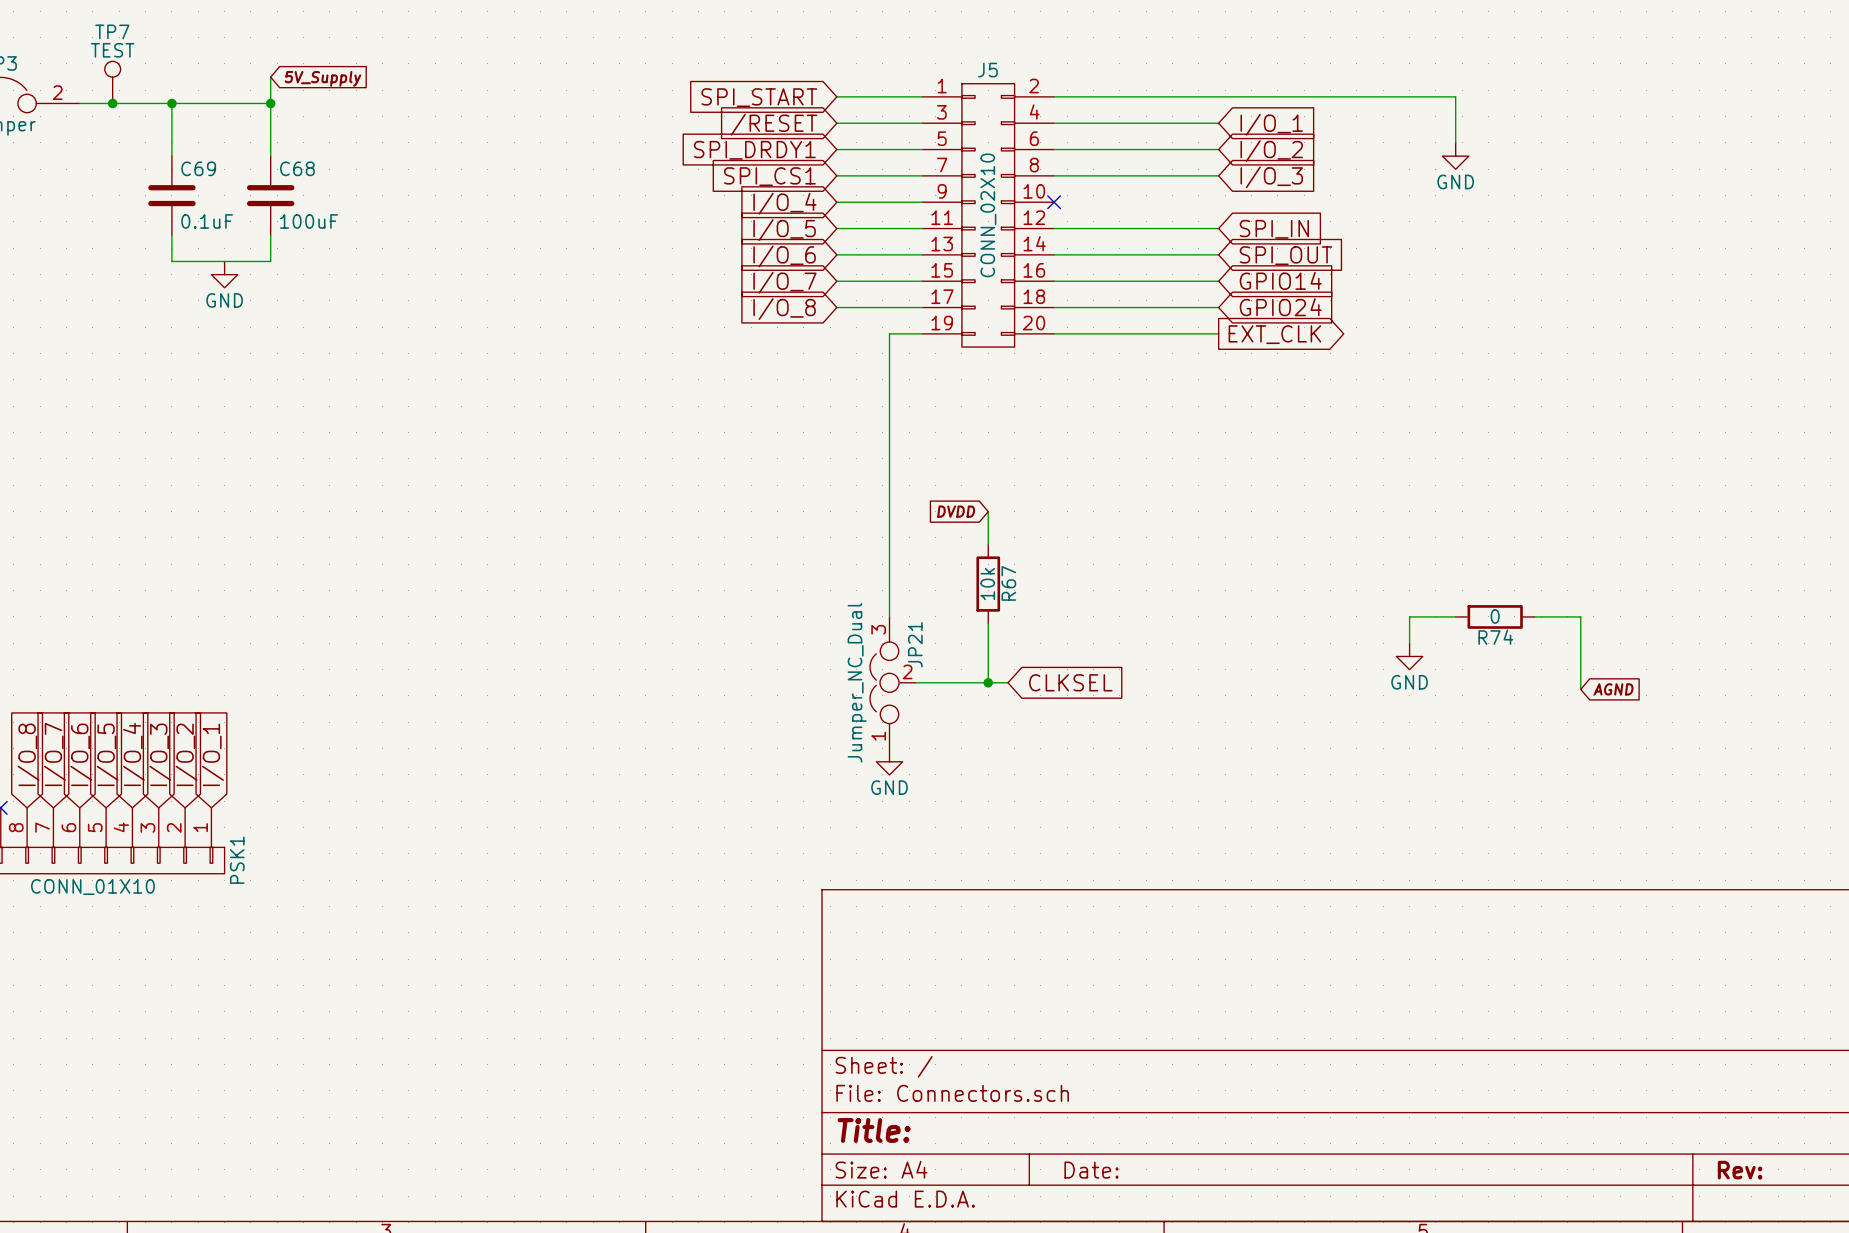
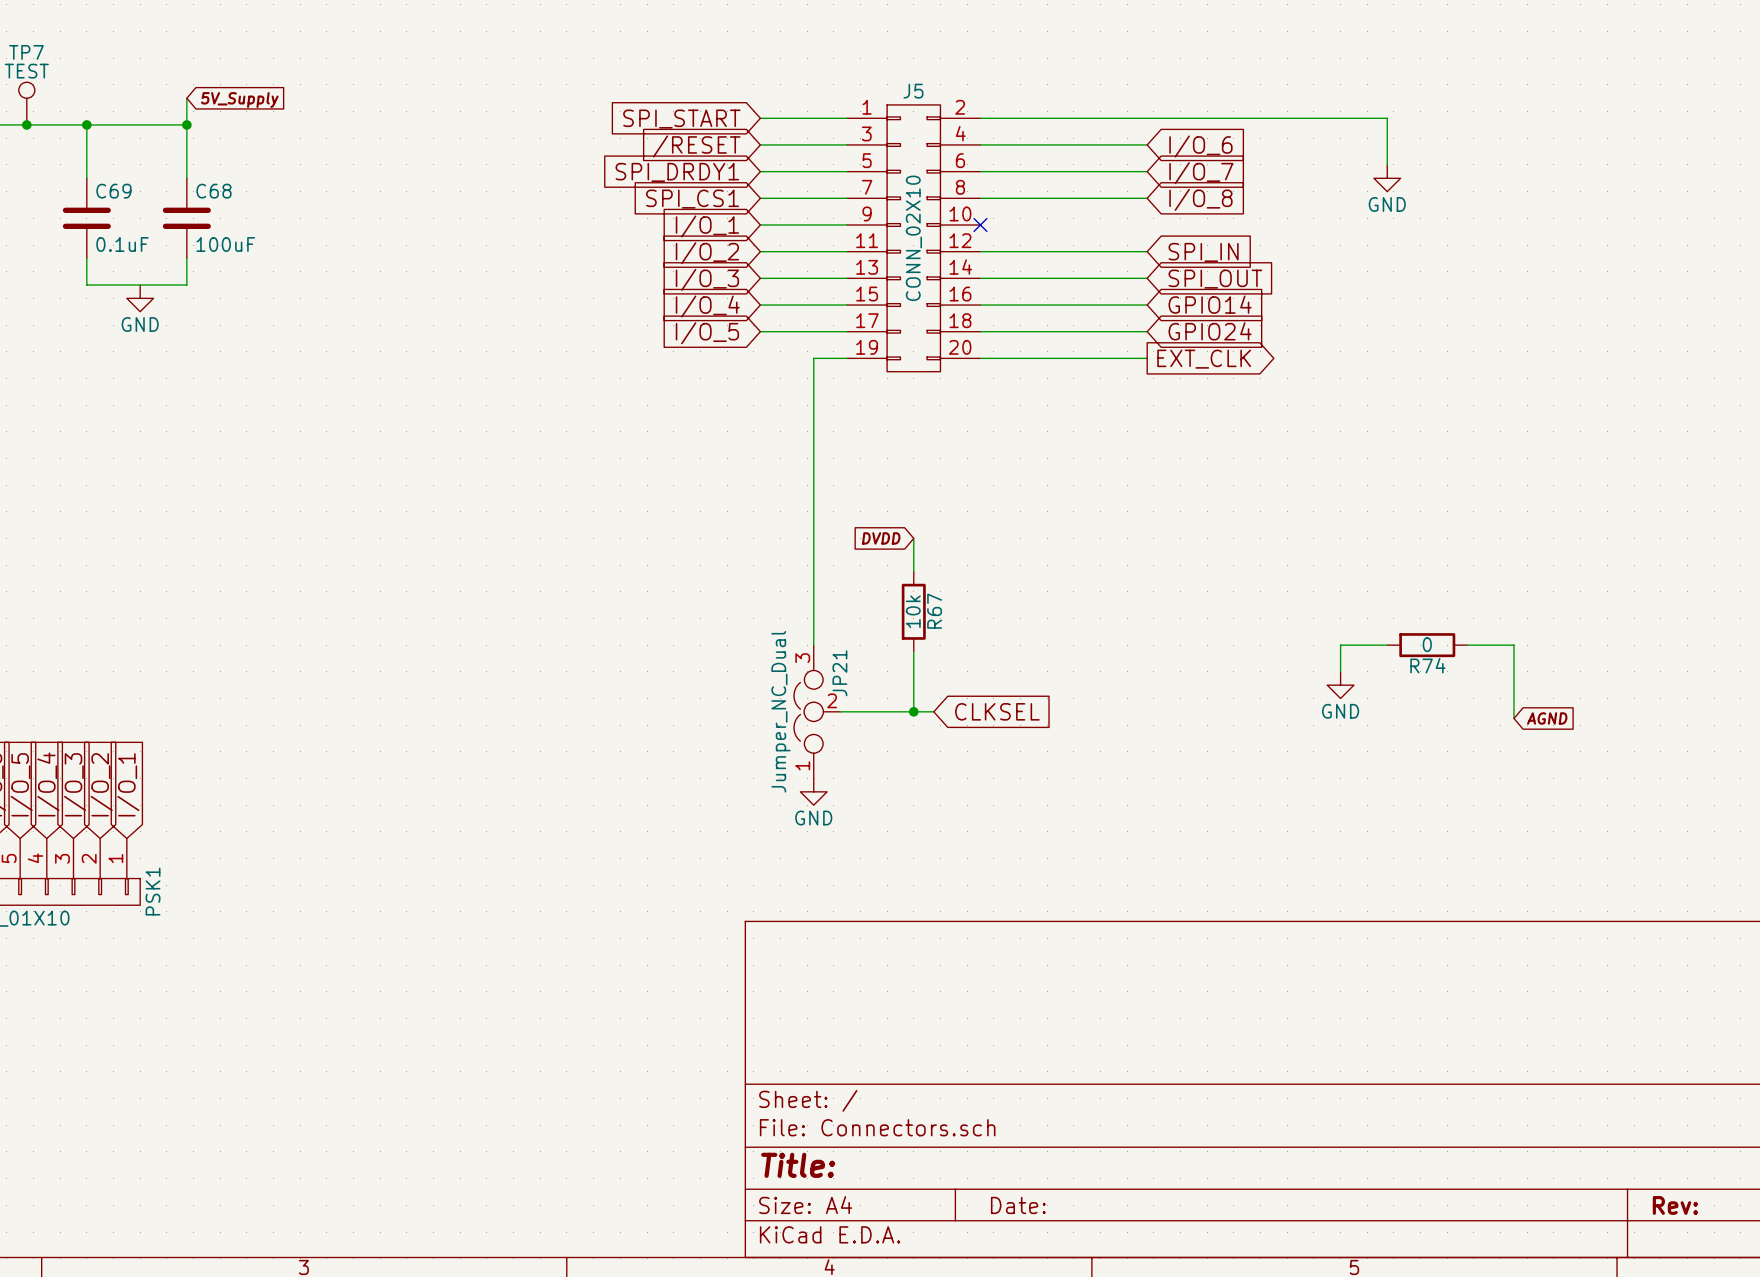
global label: I/O_1 (1271, 124) -> I/O_6 (1200, 146)
global label: I/O_2 (1271, 151) -> I/O_7 (1201, 173)
global label: I/O_3 (1271, 177) -> I/O_8 (1200, 199)
global label: I/O_4 (784, 203) -> I/O_1 (707, 226)
global label: I/O_5 (784, 230) -> I/O_2 (707, 253)
global label: I/O_6 (784, 256) -> I/O_3 (707, 279)
global label: I/O_7 (784, 282) -> I/O_4 (707, 306)
global label: I/O_8 (784, 309) -> I/O_5 (707, 333)

